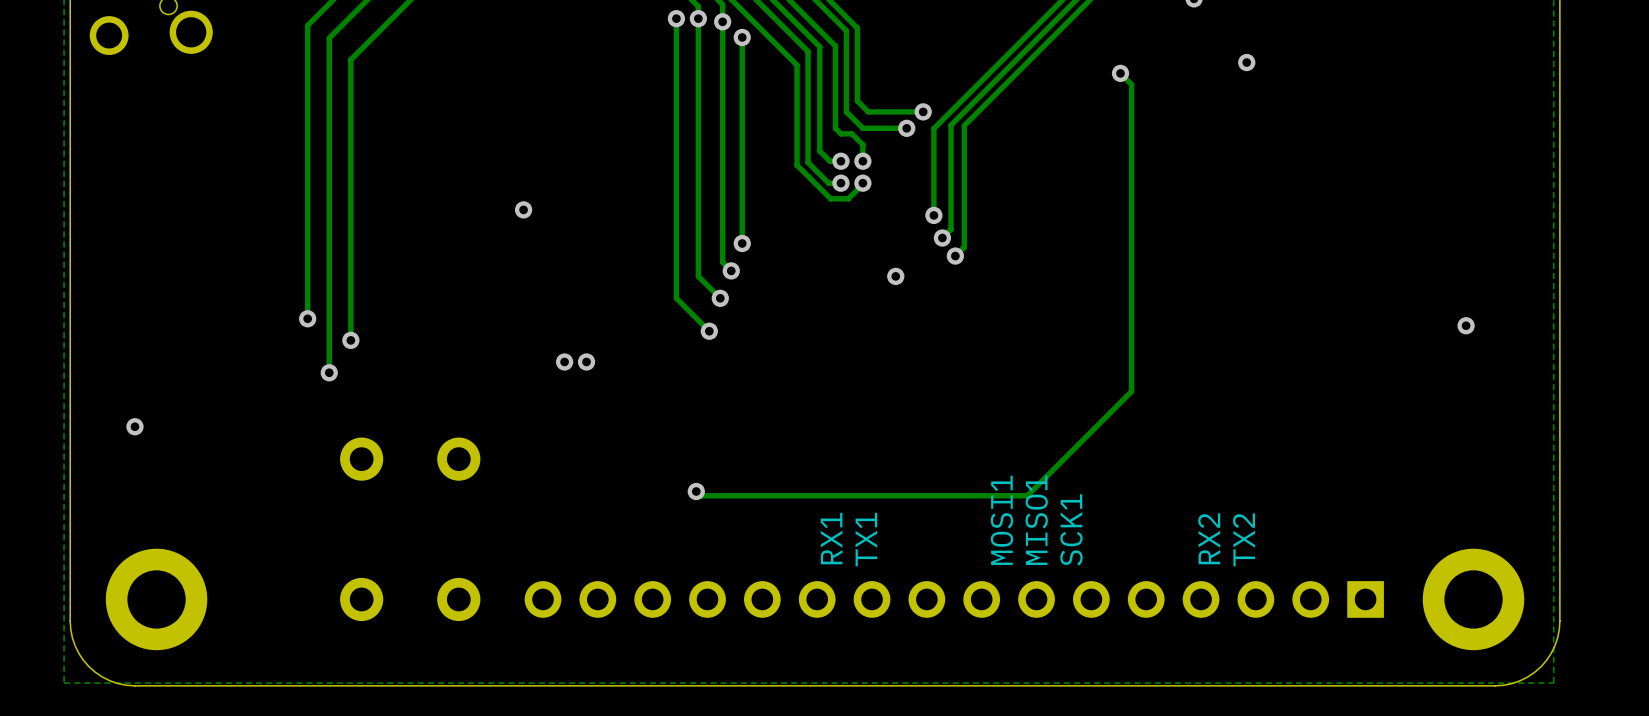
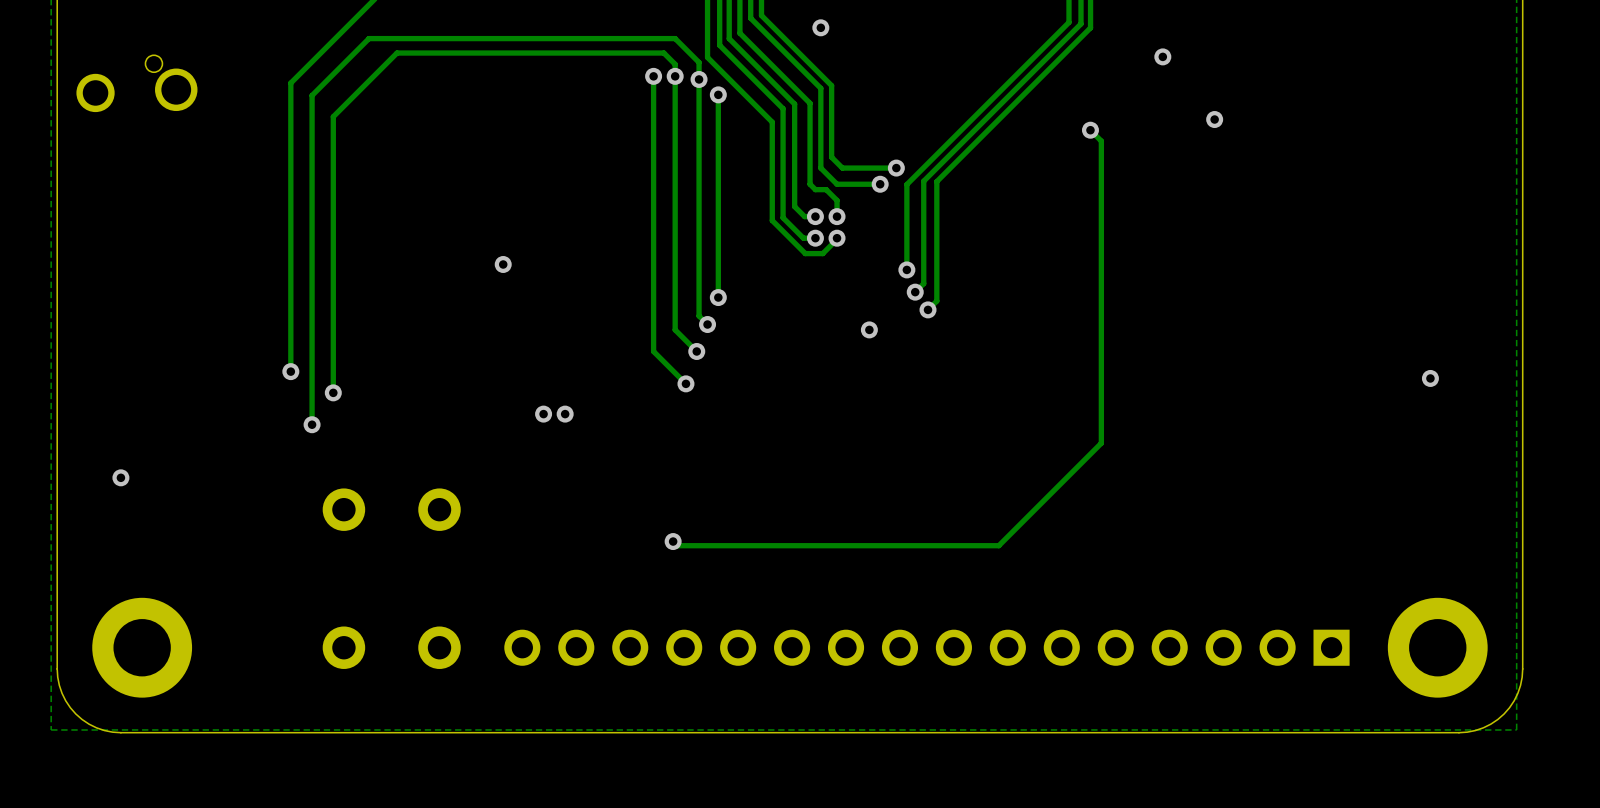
text: MOSI1 (1001, 520) -> none
text: MISO1 (1036, 520) -> none
text: SCK1 (1071, 529) -> none
text: RX1 (831, 538) -> none
text: RX2 (1209, 538) -> none
text: TX1 (866, 539) -> none
text: TX2 (1244, 539) -> none

